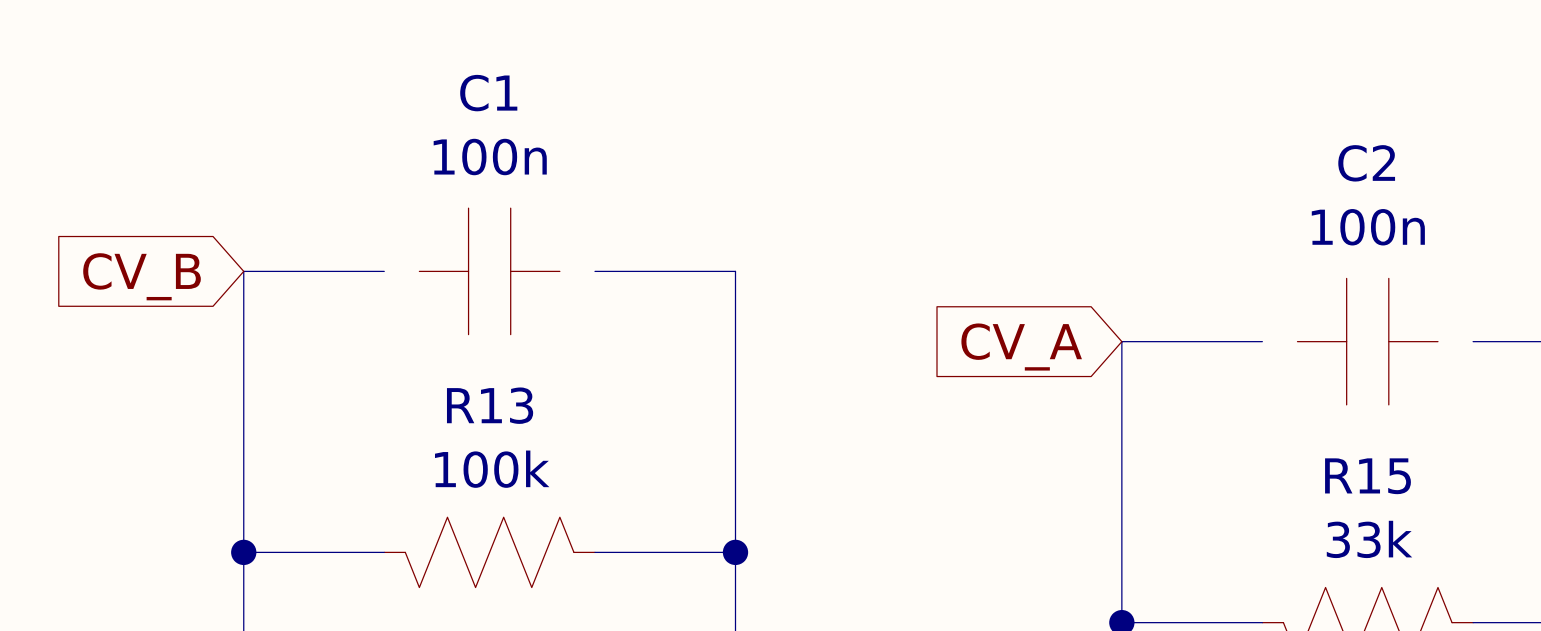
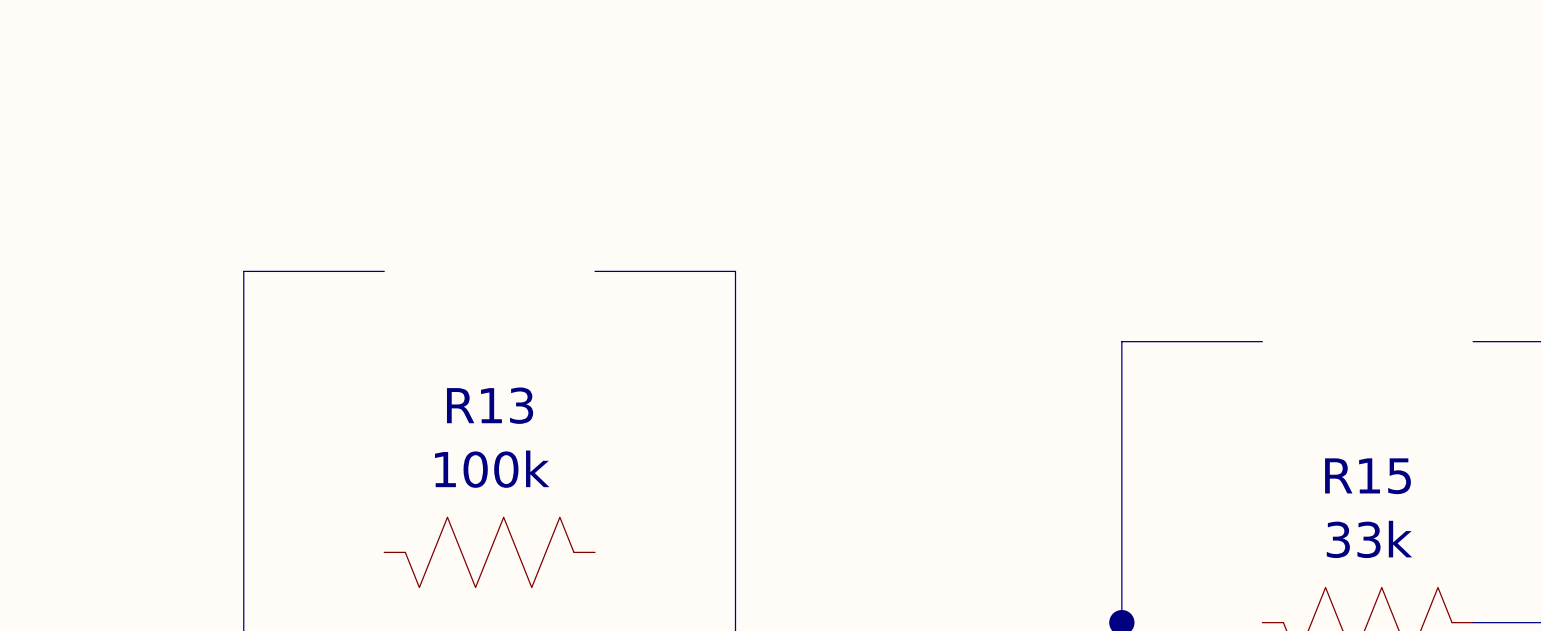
C1: 100n (489, 271) -> none
global label: CV_B (142, 276) -> none
C2: 100n (1367, 341) -> none
global label: CV_A (1021, 347) -> none
wire: (243, 552) (384, 552) -> none
junction: (243, 552) -> none
wire: (595, 552) (735, 552) -> none
junction: (735, 552) -> none
wire: (1121, 622) (1262, 622) -> none

